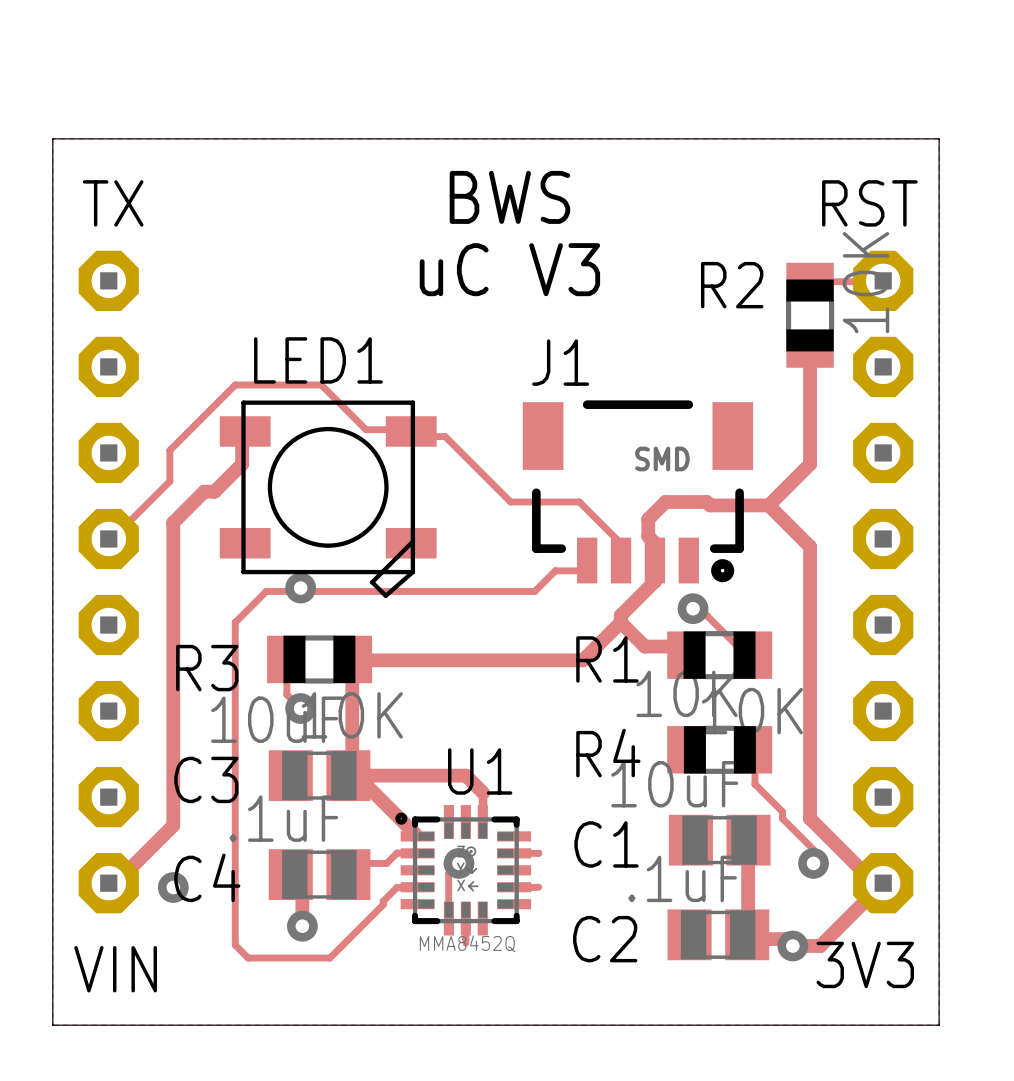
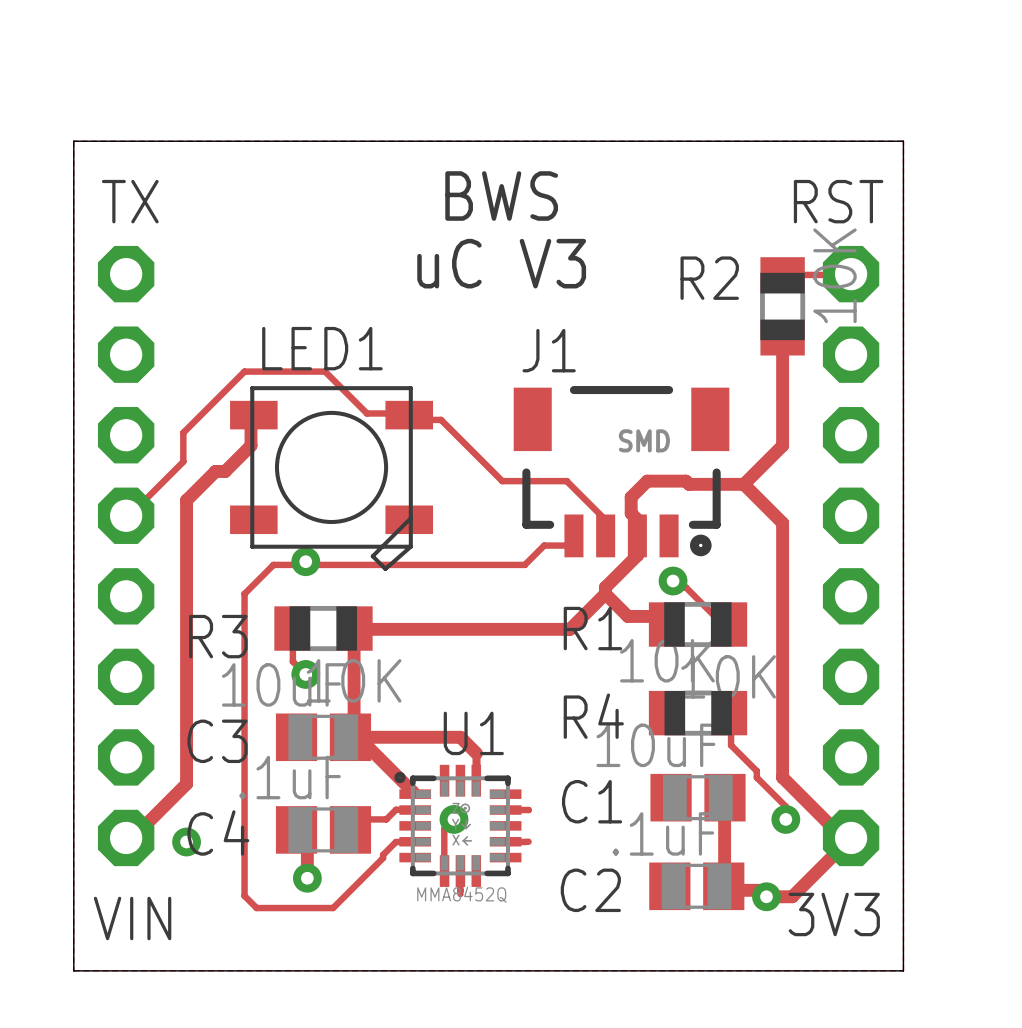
part side: top (108, 582) -> bottom (126, 556)
part side: top (883, 582) -> bottom (851, 556)

